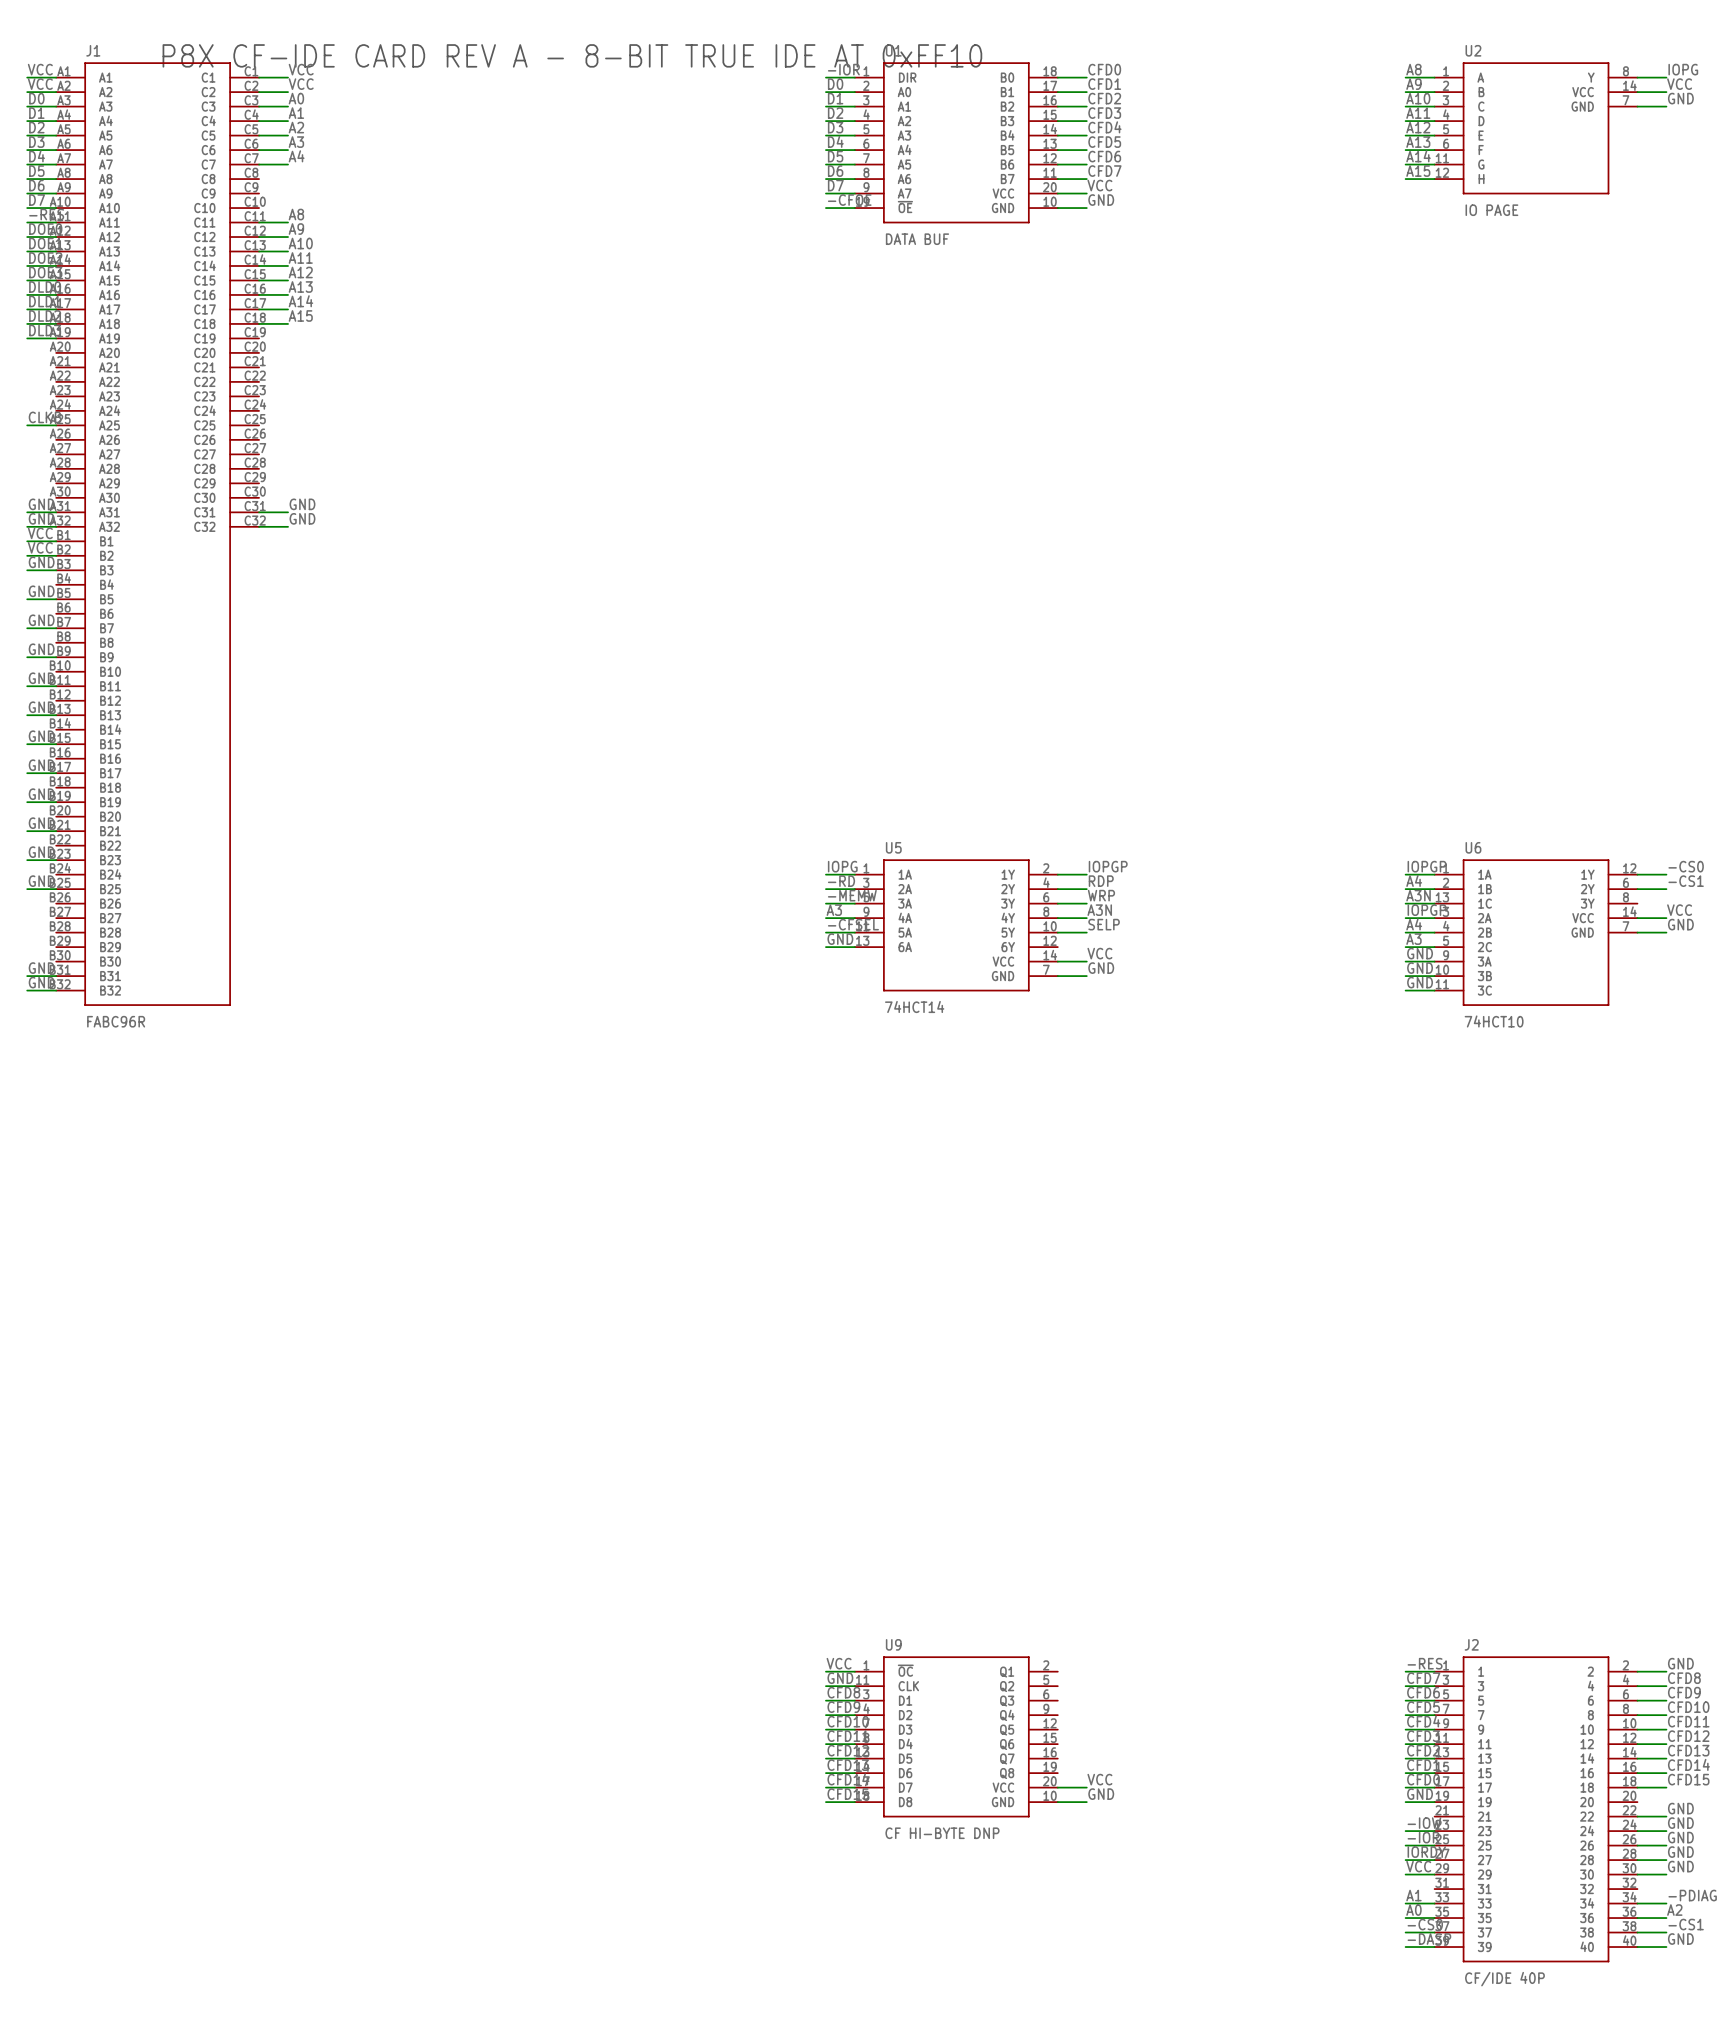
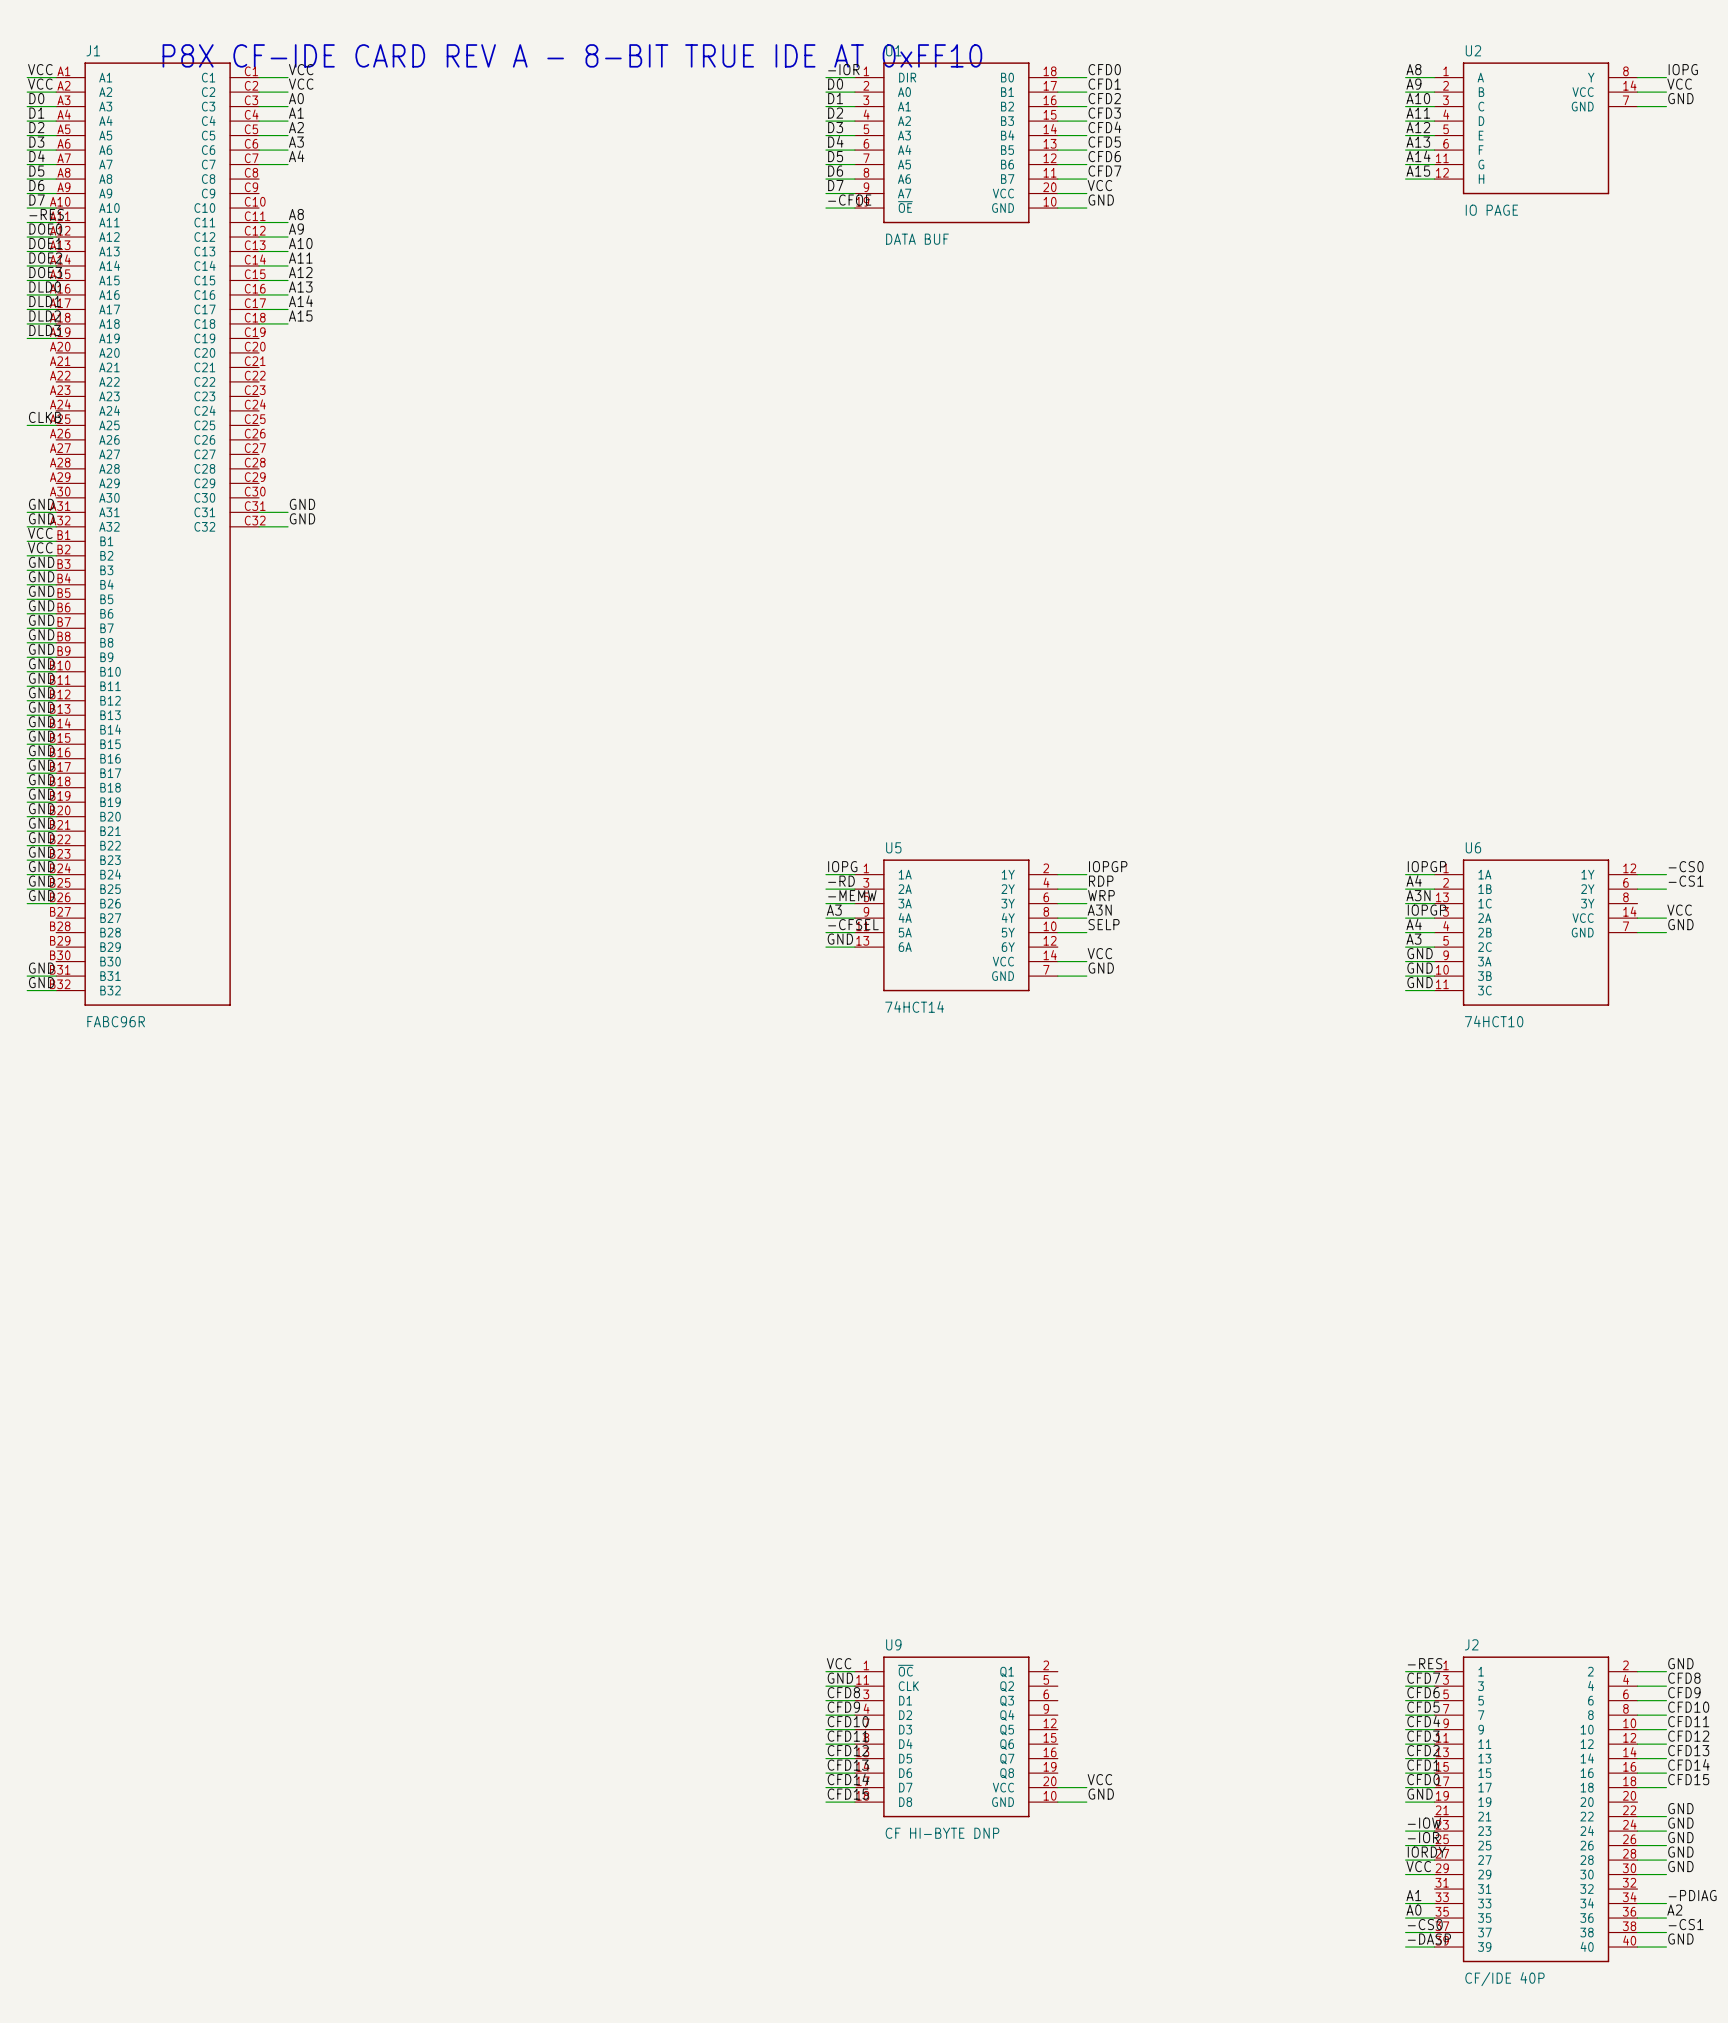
label: none -> GND (41, 576)
wire: none -> (27, 584) (56, 584)
label: none -> GND (41, 605)
wire: none -> (27, 613) (56, 613)
label: none -> GND (41, 634)
wire: none -> (27, 642) (56, 642)
label: none -> GND (41, 663)
wire: none -> (27, 671) (56, 671)
label: none -> GND (41, 692)
wire: none -> (27, 700) (56, 700)
label: none -> GND (41, 721)
wire: none -> (27, 729) (56, 729)
label: none -> GND (41, 750)
wire: none -> (27, 758) (56, 758)
label: none -> GND (41, 779)
wire: none -> (27, 787) (56, 787)
label: none -> GND (41, 808)
wire: none -> (27, 816) (56, 816)
label: none -> GND (41, 837)
wire: none -> (27, 845) (56, 845)
label: none -> GND (41, 866)
wire: none -> (27, 874) (56, 874)
label: none -> GND (41, 895)
wire: none -> (27, 903) (56, 903)

